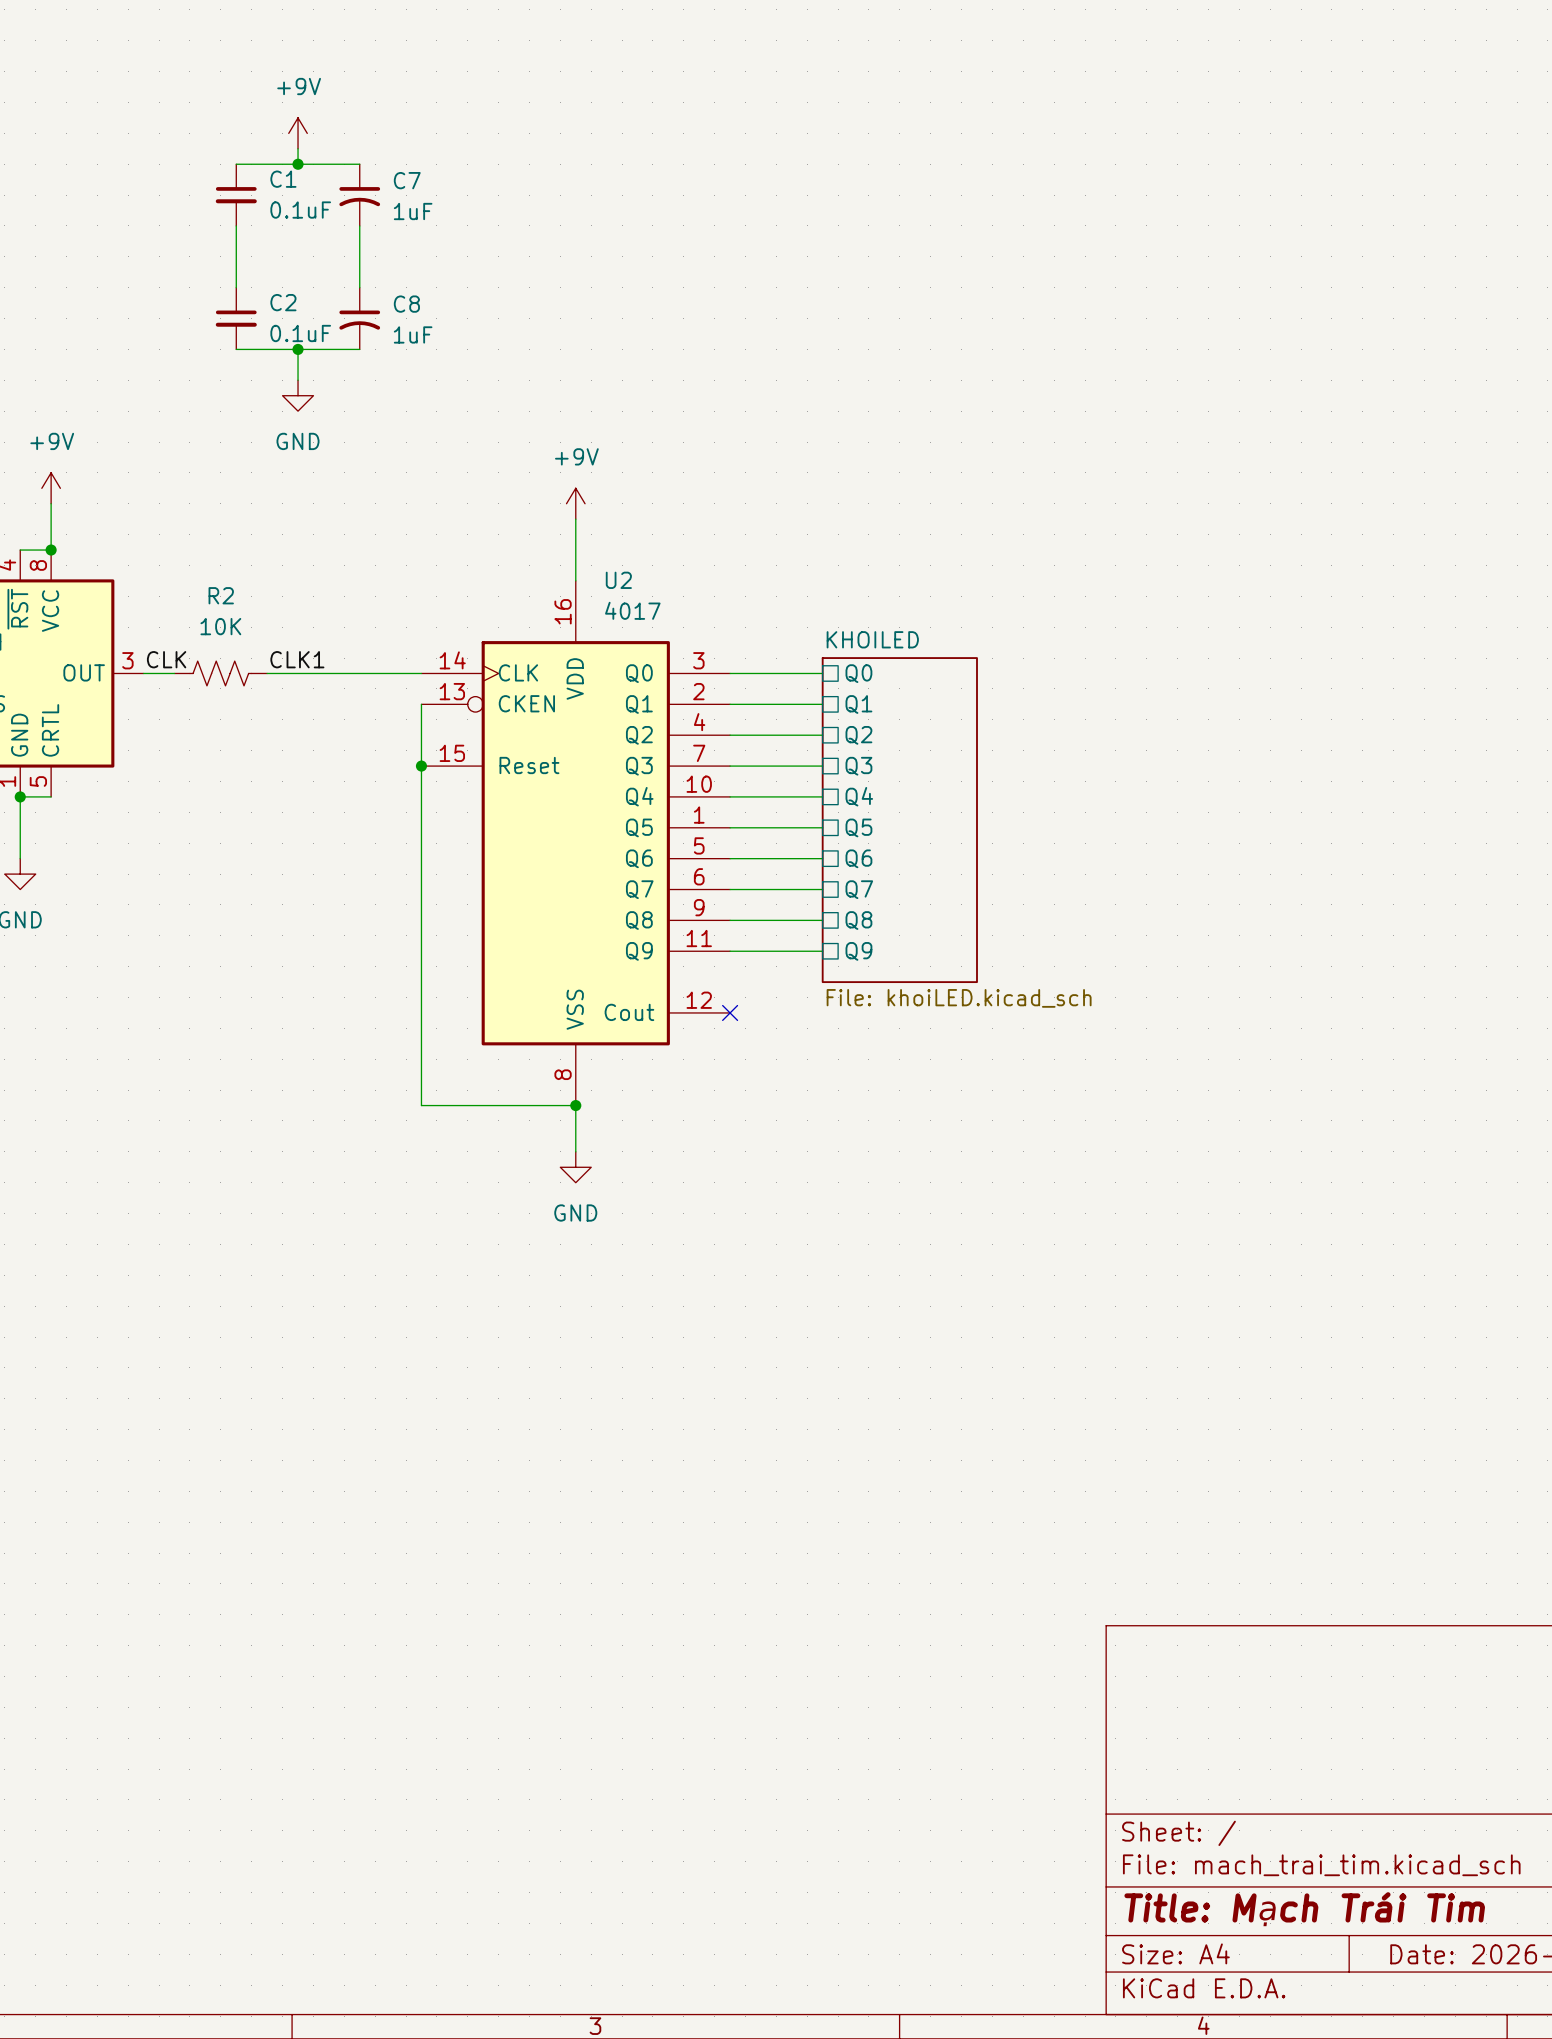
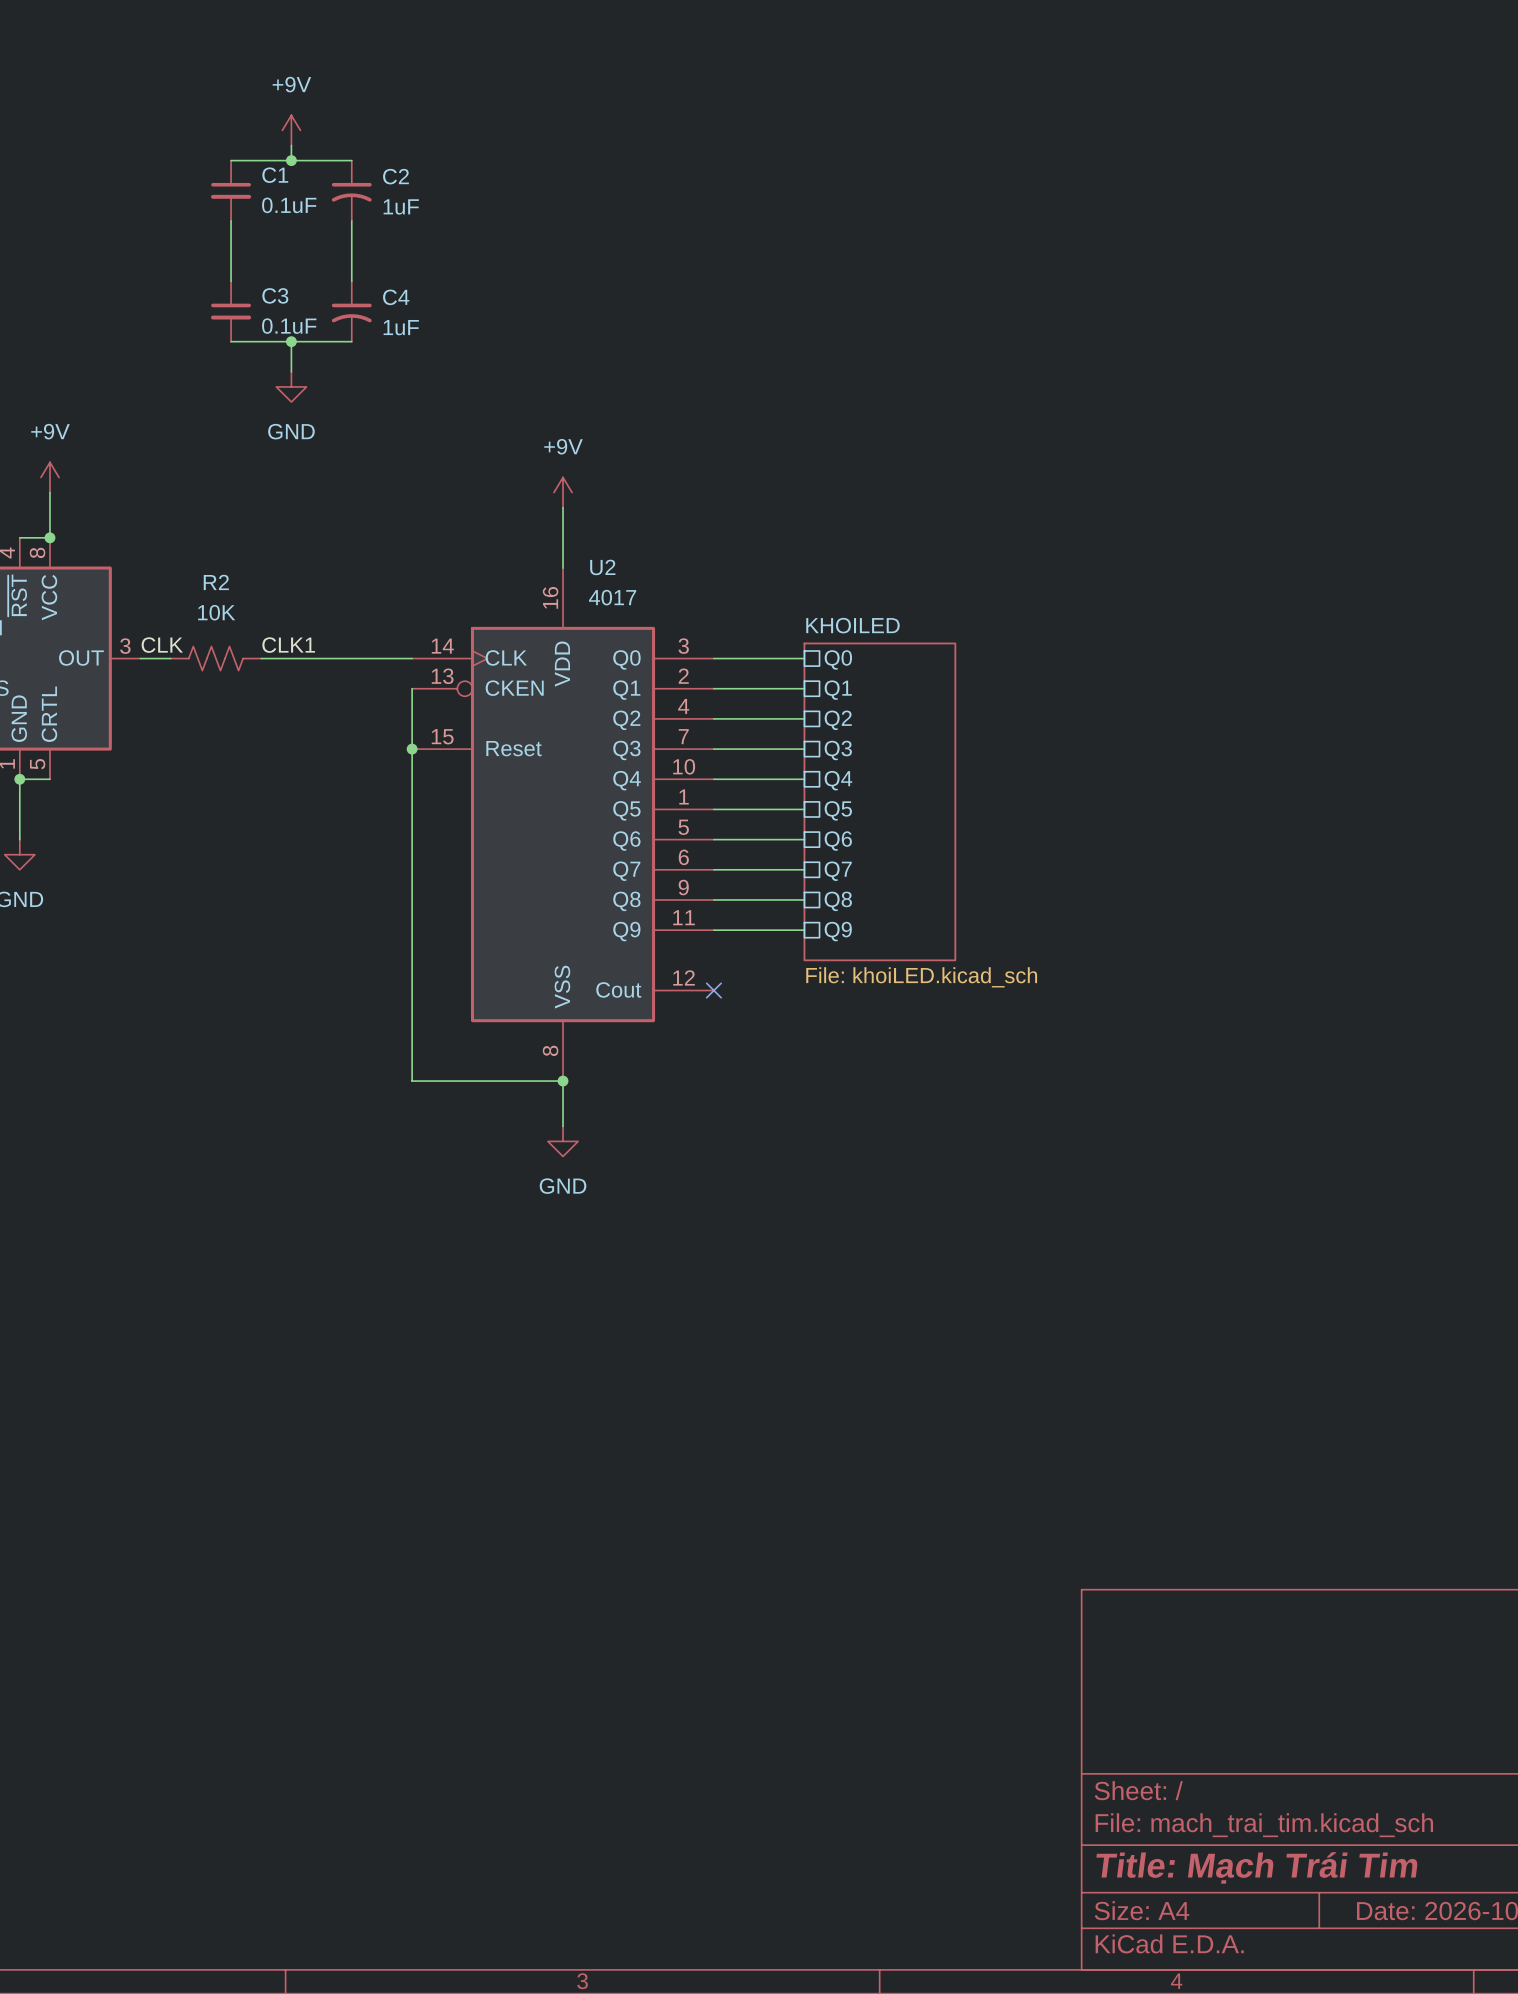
C7 name: C7 (407, 180) -> C2 (395, 176)
C2 name: C2 (283, 302) -> C3 (275, 295)
C8 name: C8 (406, 304) -> C4 (396, 297)

